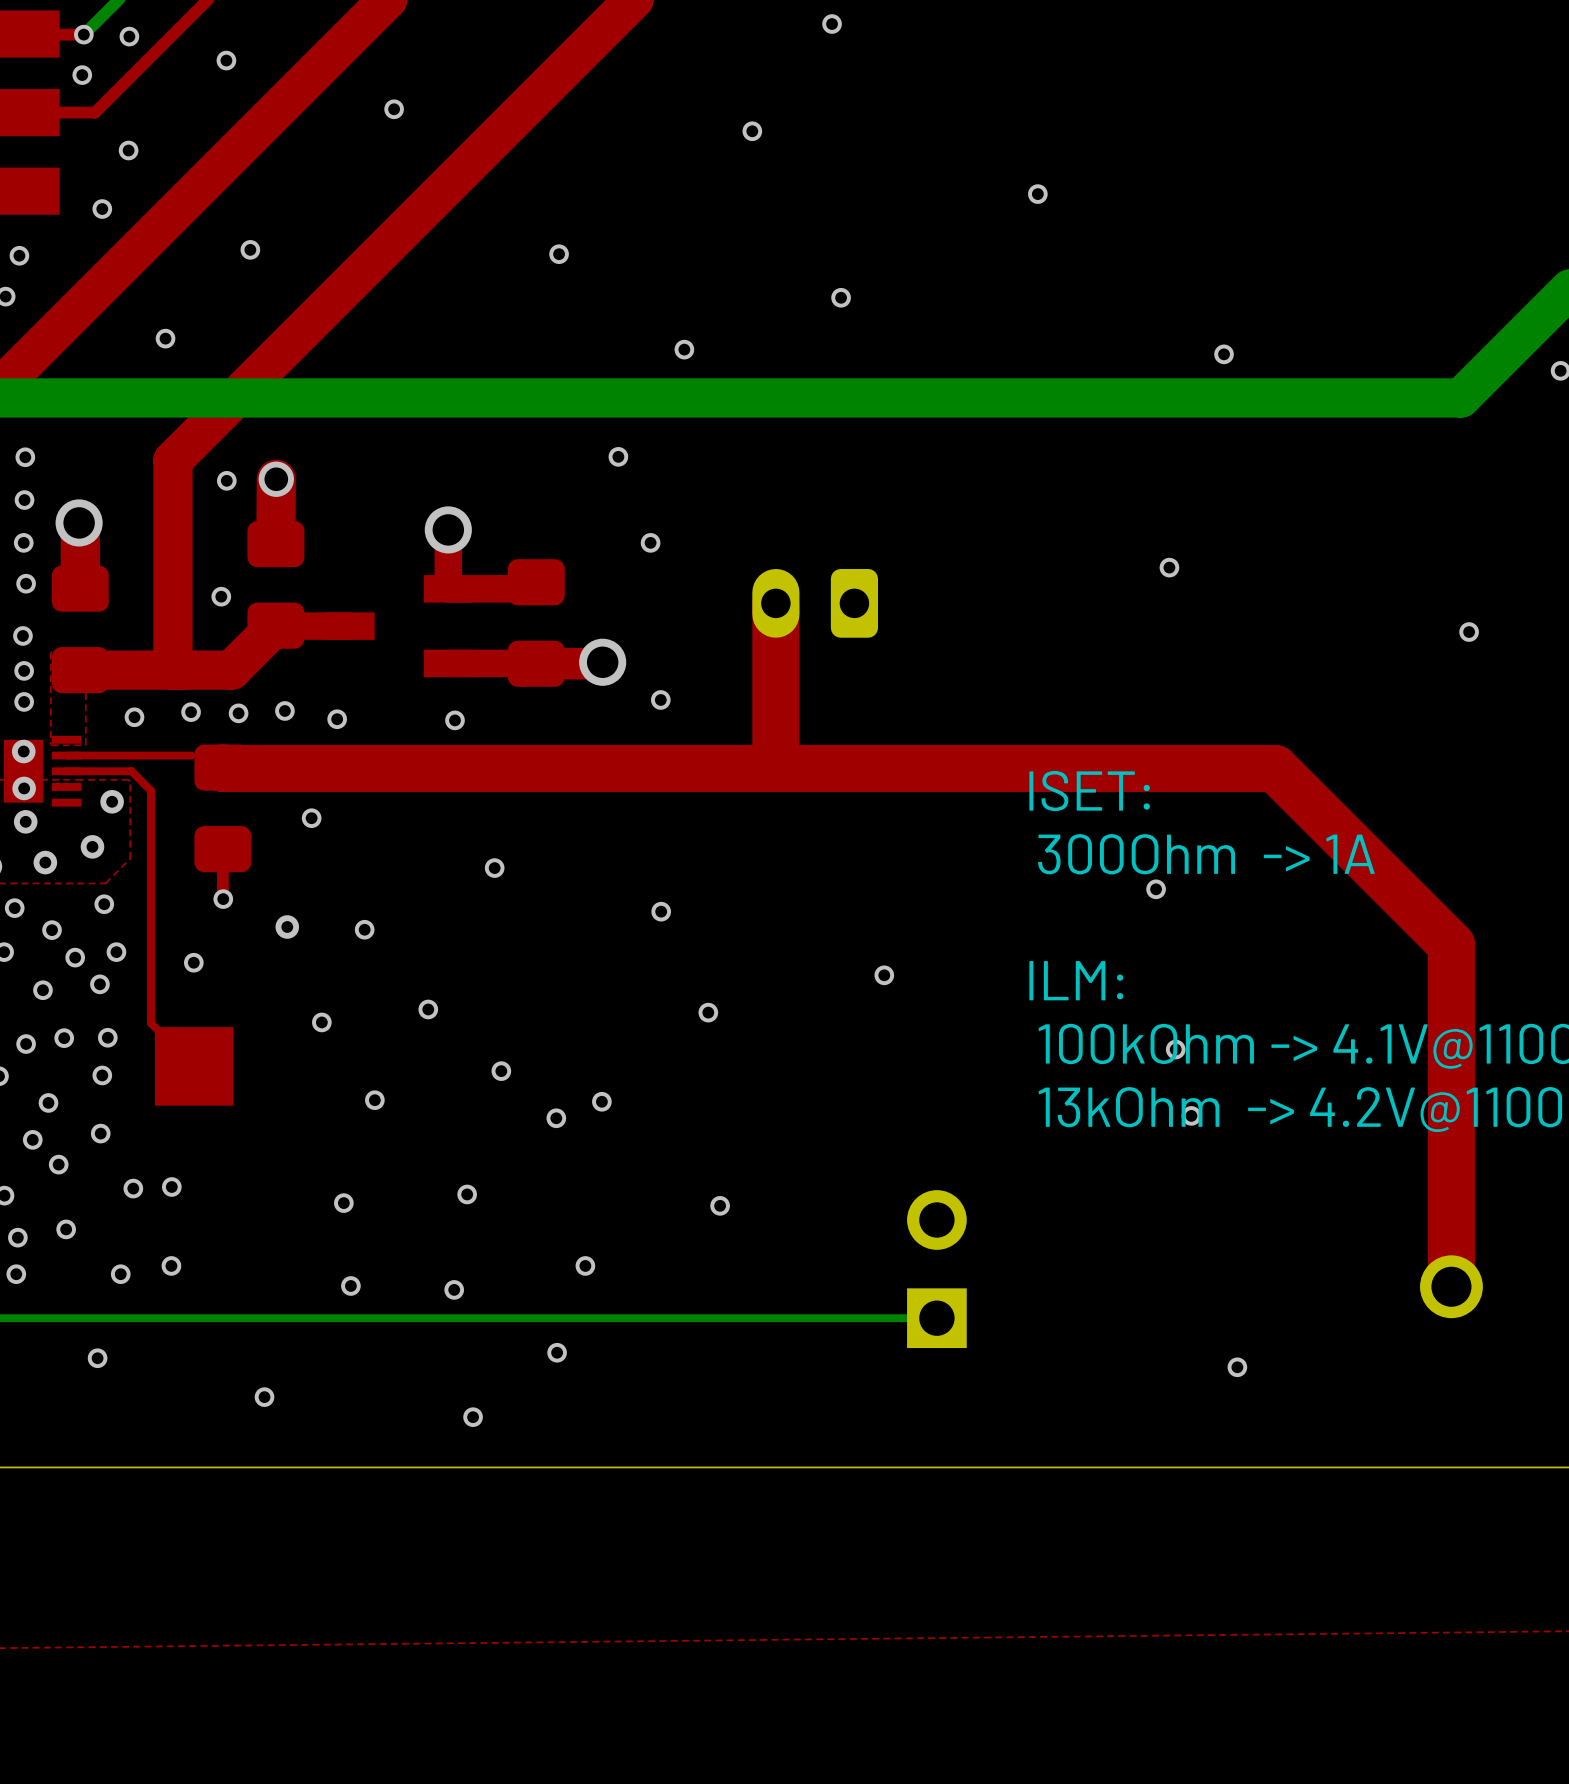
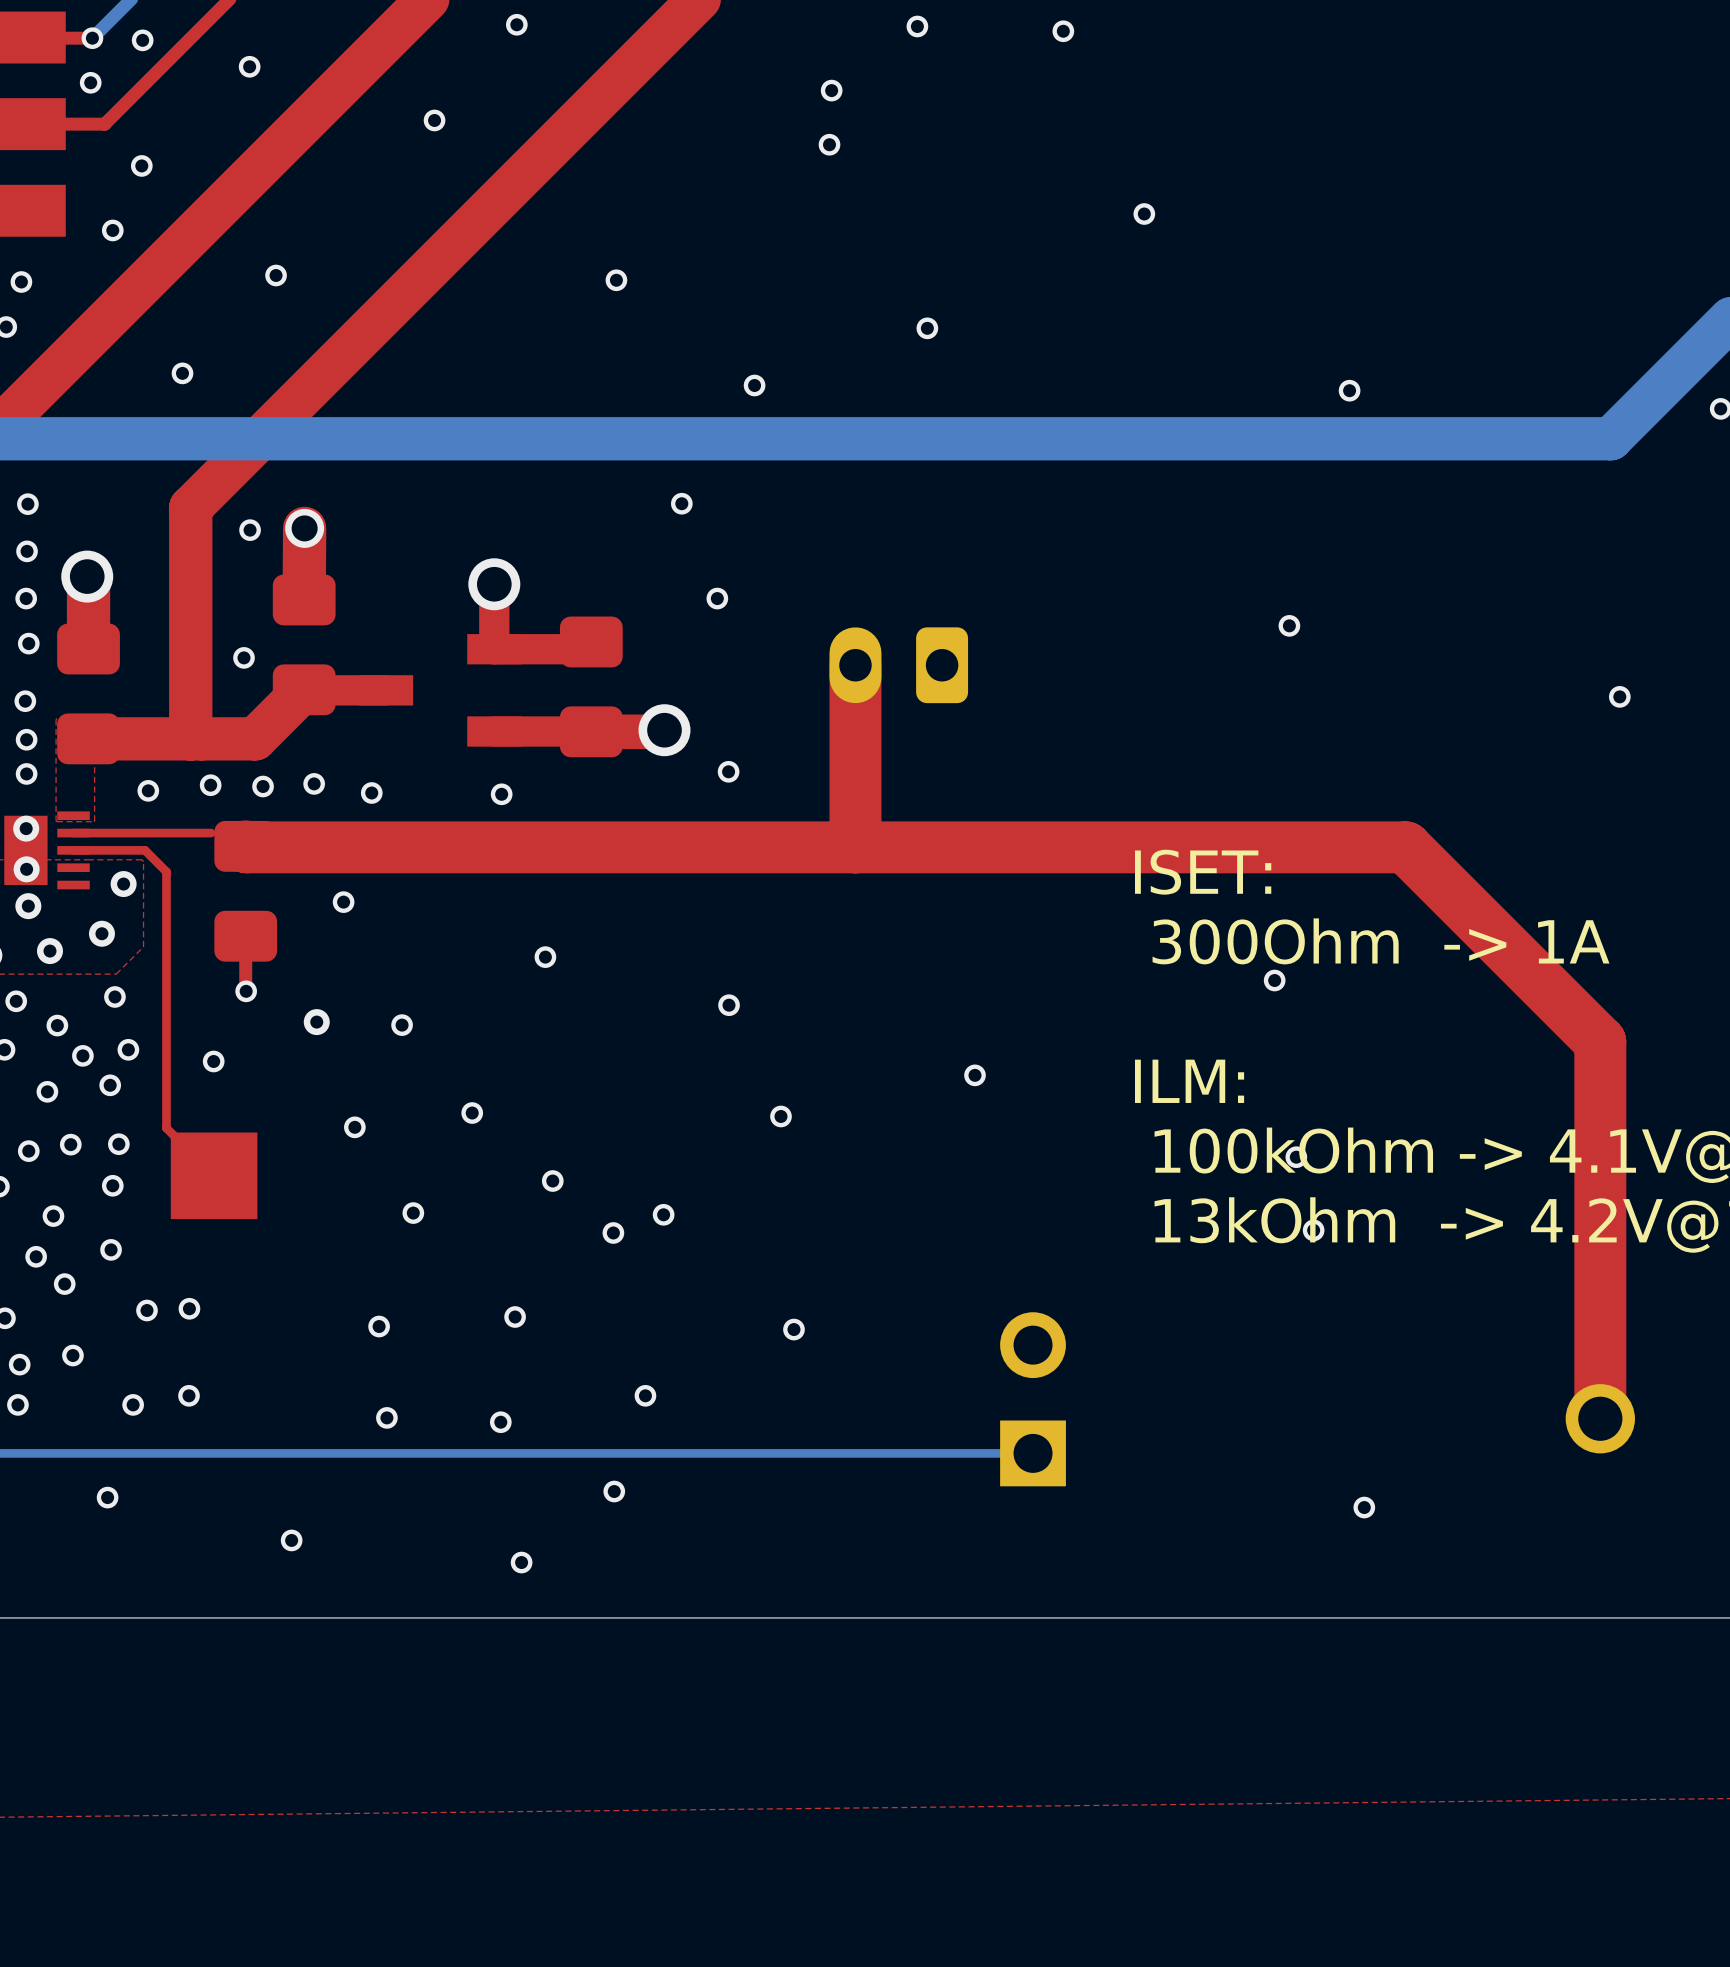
via: none -> (516, 24)
via: none -> (1063, 31)
via: none -> (831, 90)

